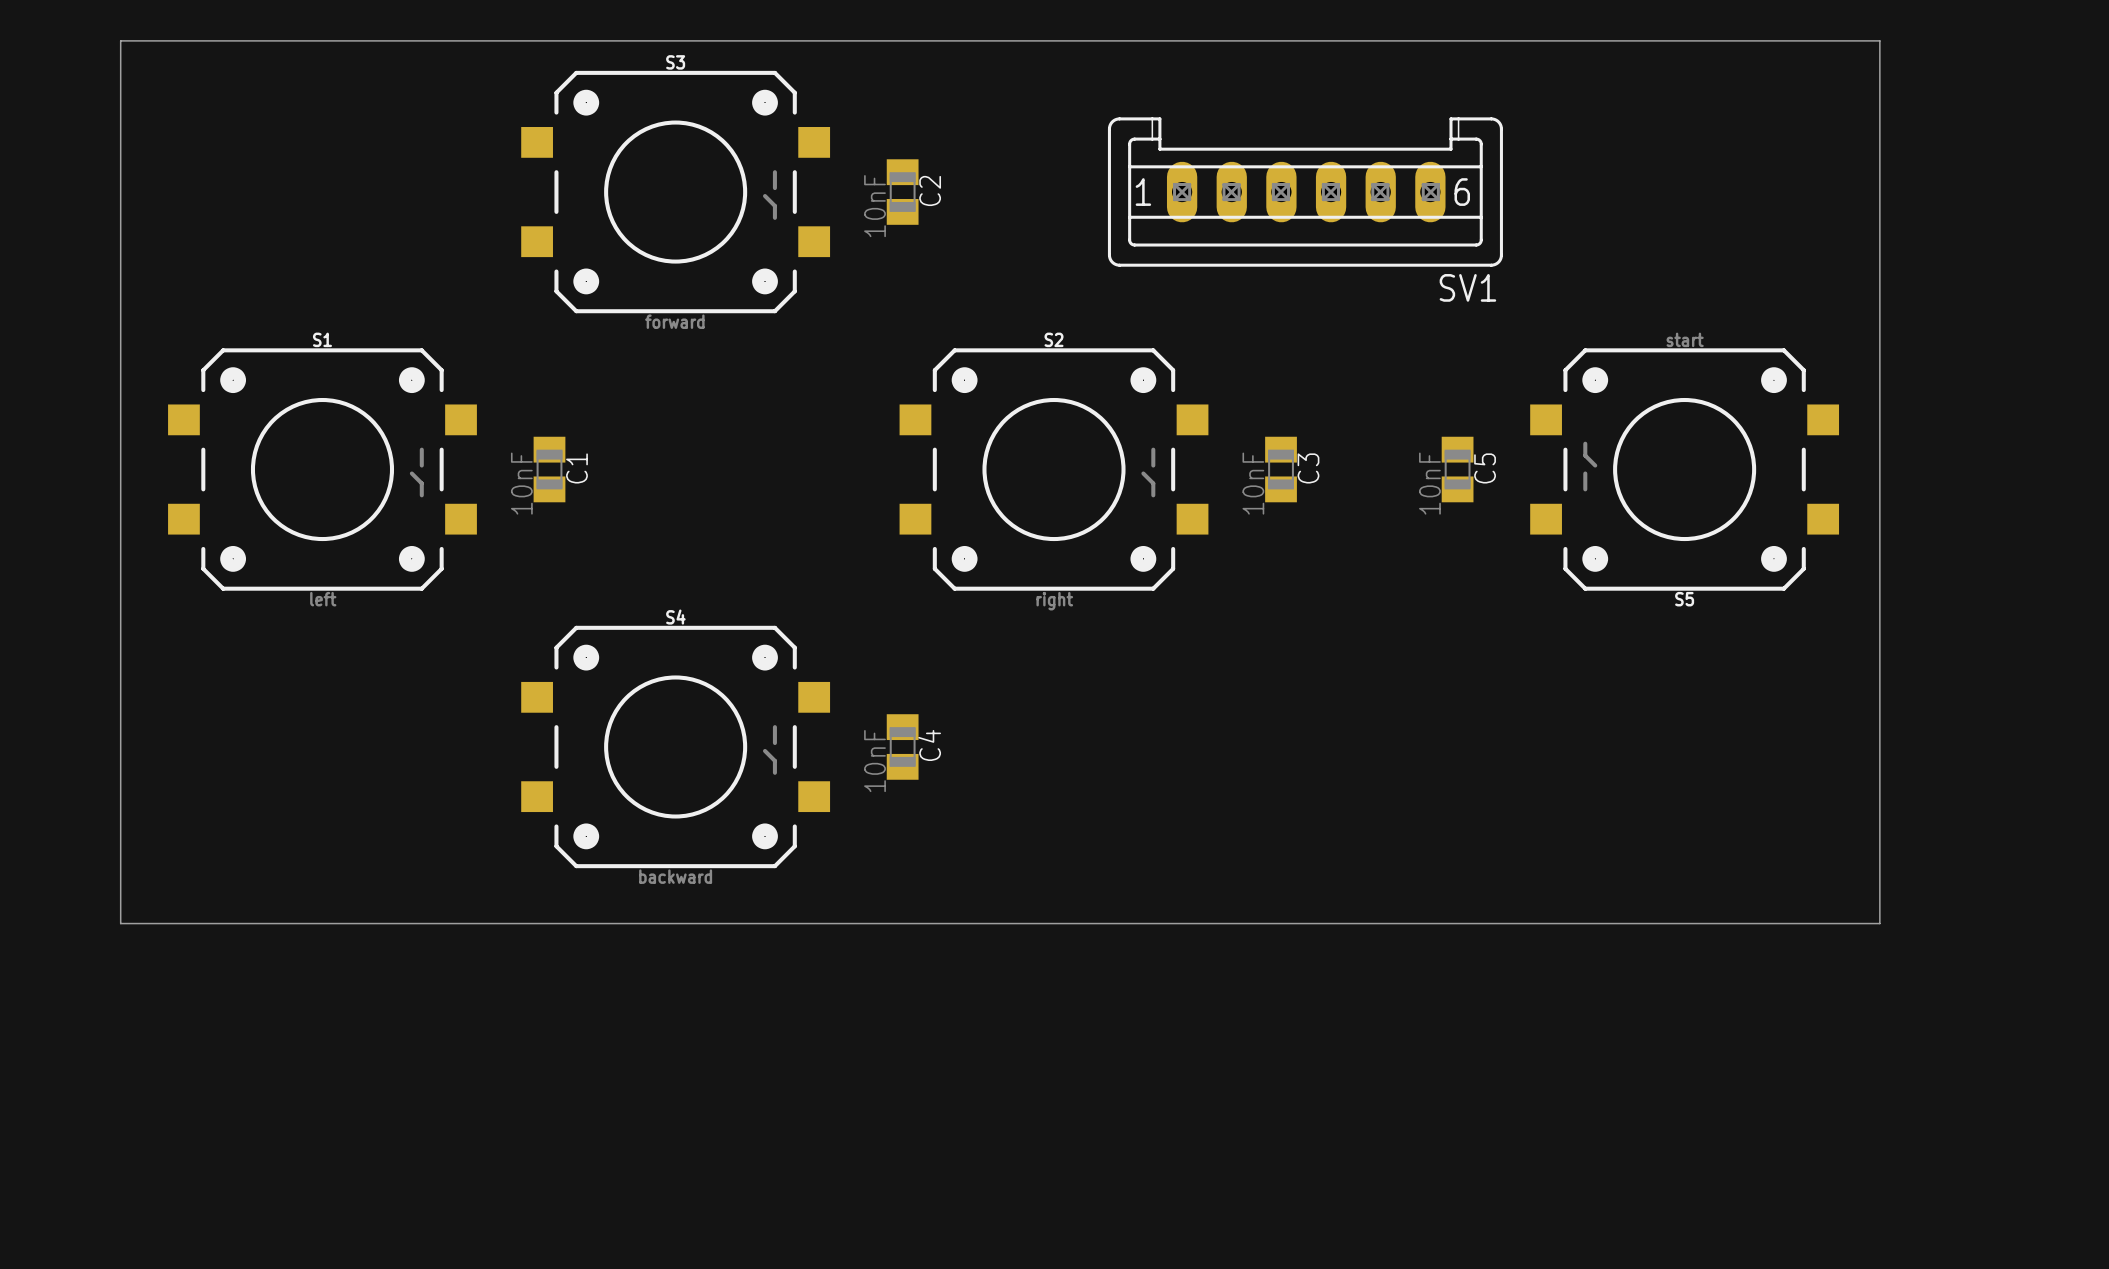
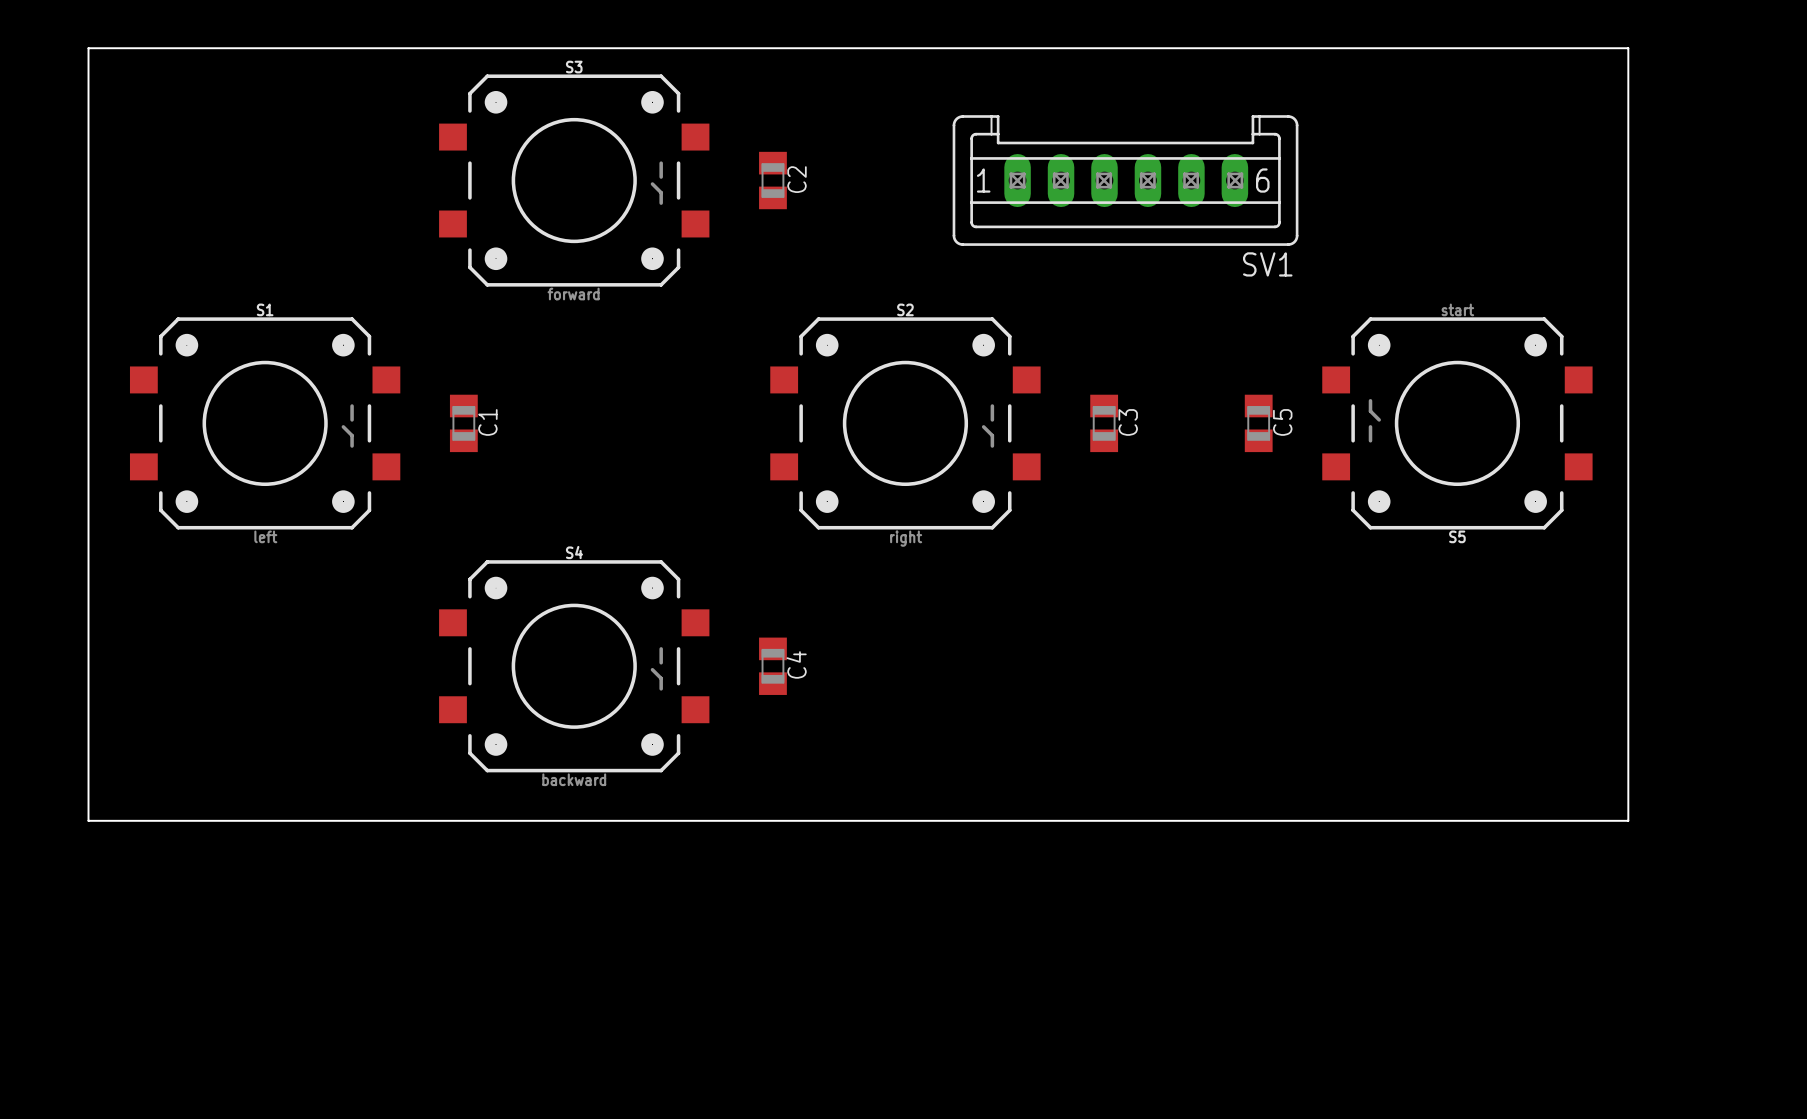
C2 value: 10nF (875, 206) -> none
C1 value: 10nF (521, 483) -> none
C3 value: 10nF (1253, 483) -> none
C5 value: 10nF (1429, 483) -> none
C4 value: 10nF (875, 761) -> none

